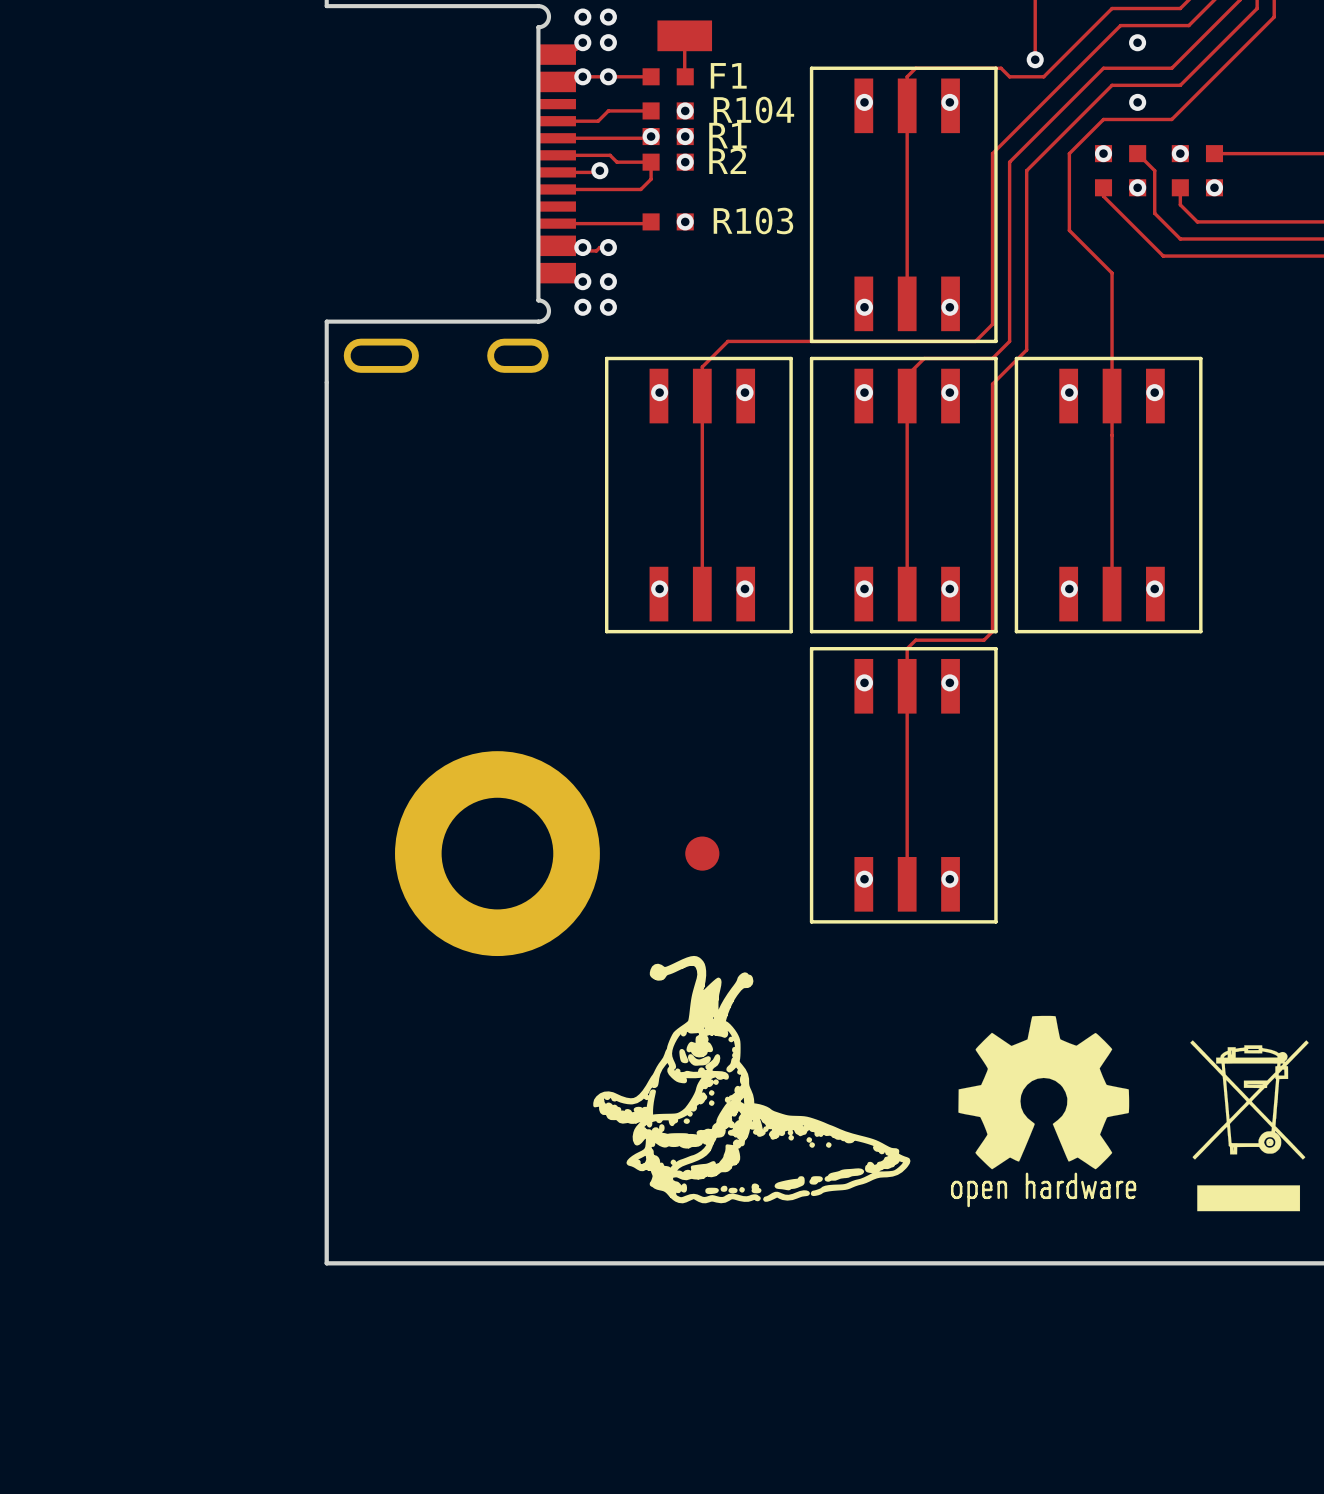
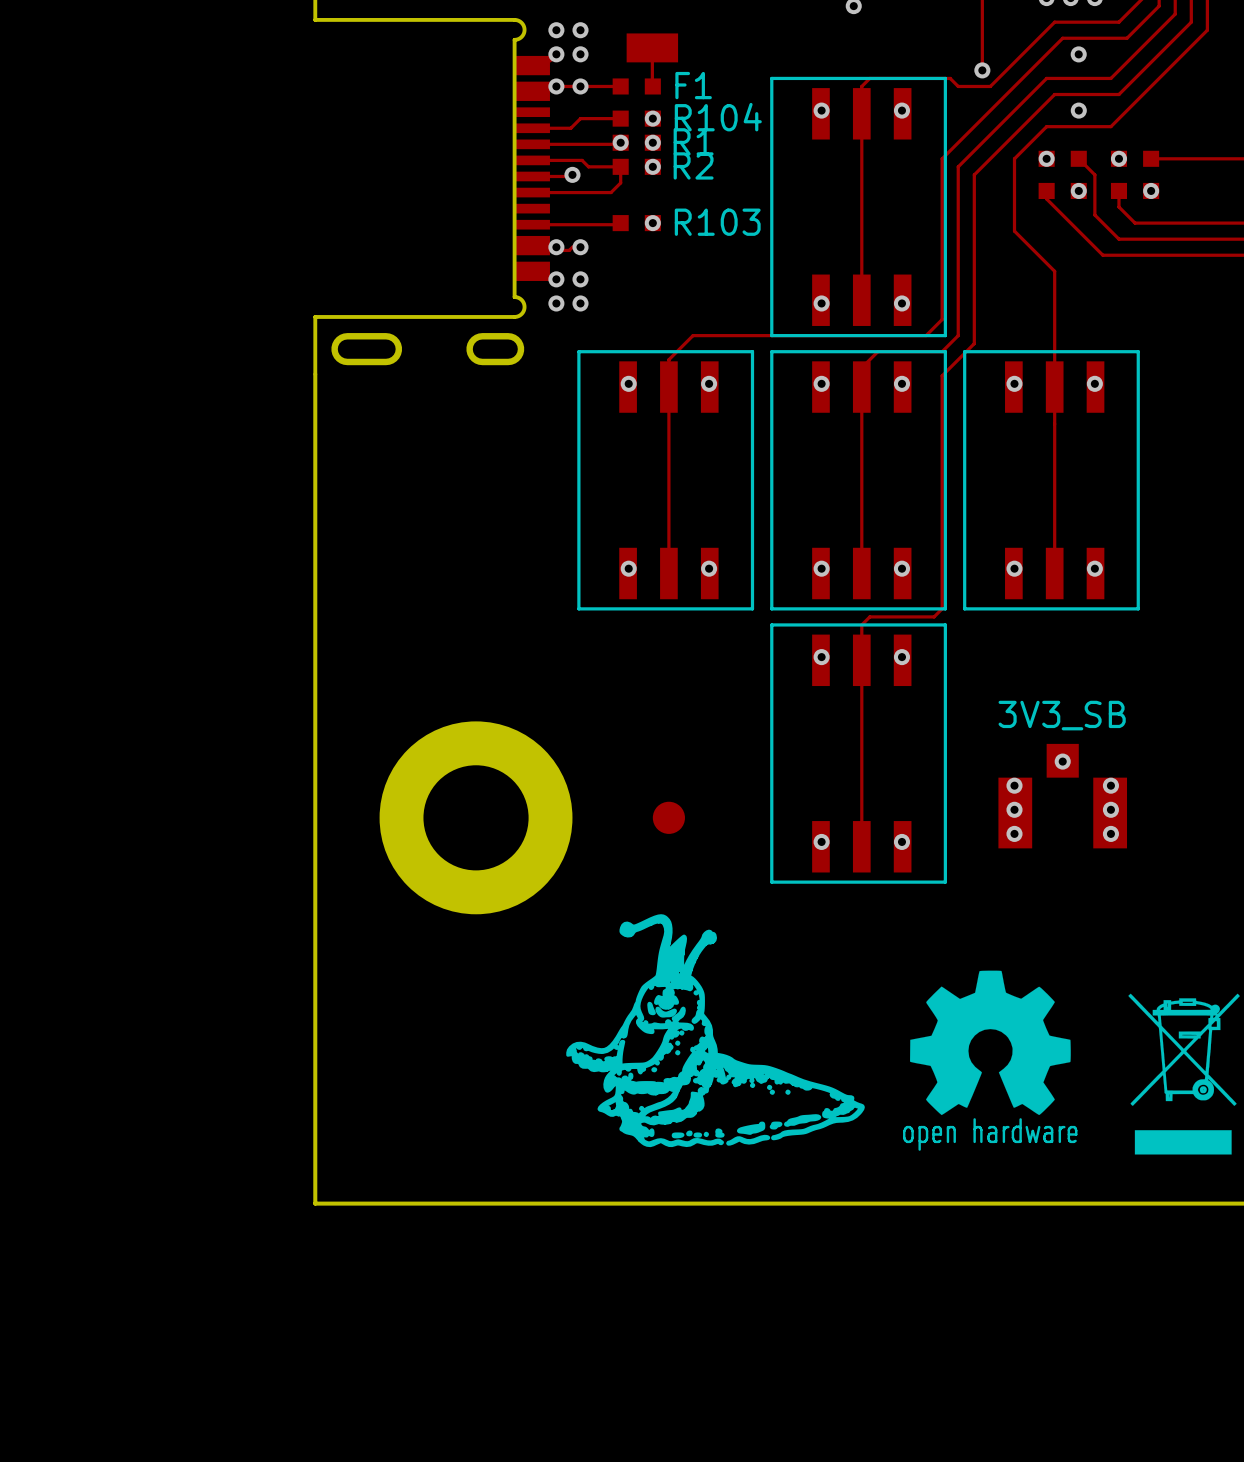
text: none -> 3V3_SB (1062, 715)
via: none -> (1062, 761)
via: none -> (1014, 785)
via: none -> (1110, 785)
part: none -> (1062, 796)
via: none -> (1014, 809)
via: none -> (1110, 809)
via: none -> (1014, 833)
via: none -> (1110, 833)

